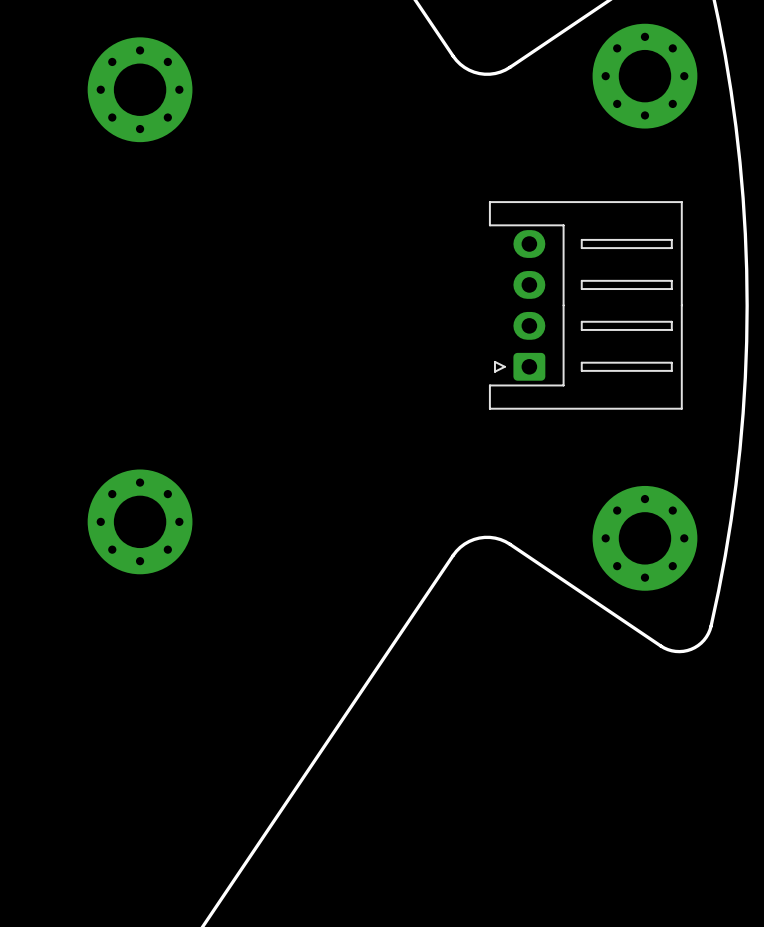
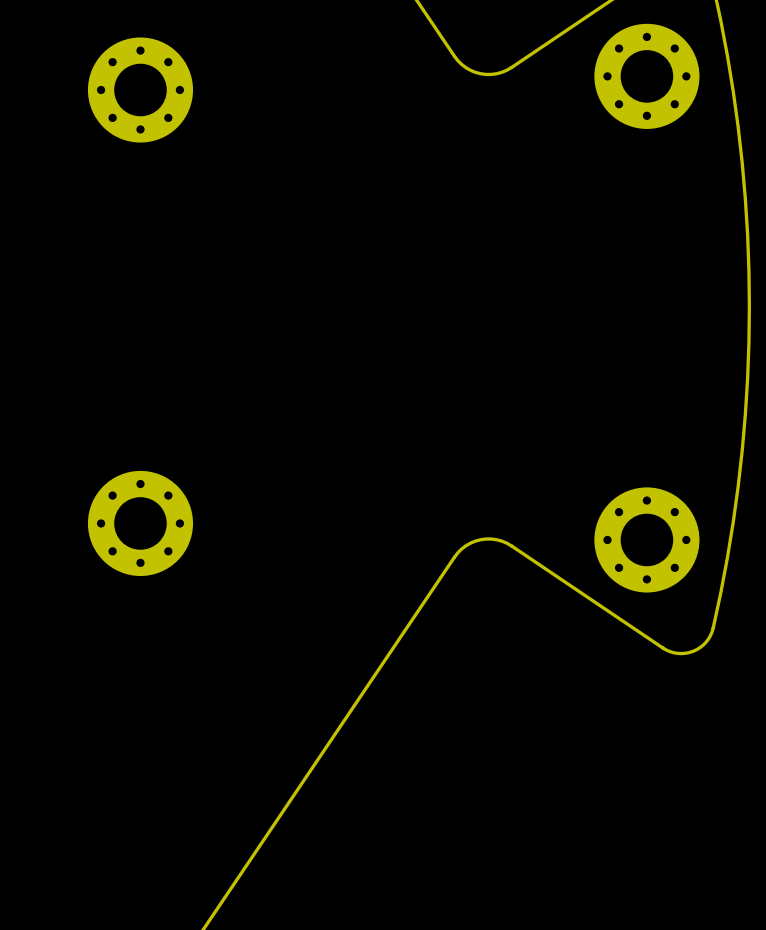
part: (585, 305) -> none

